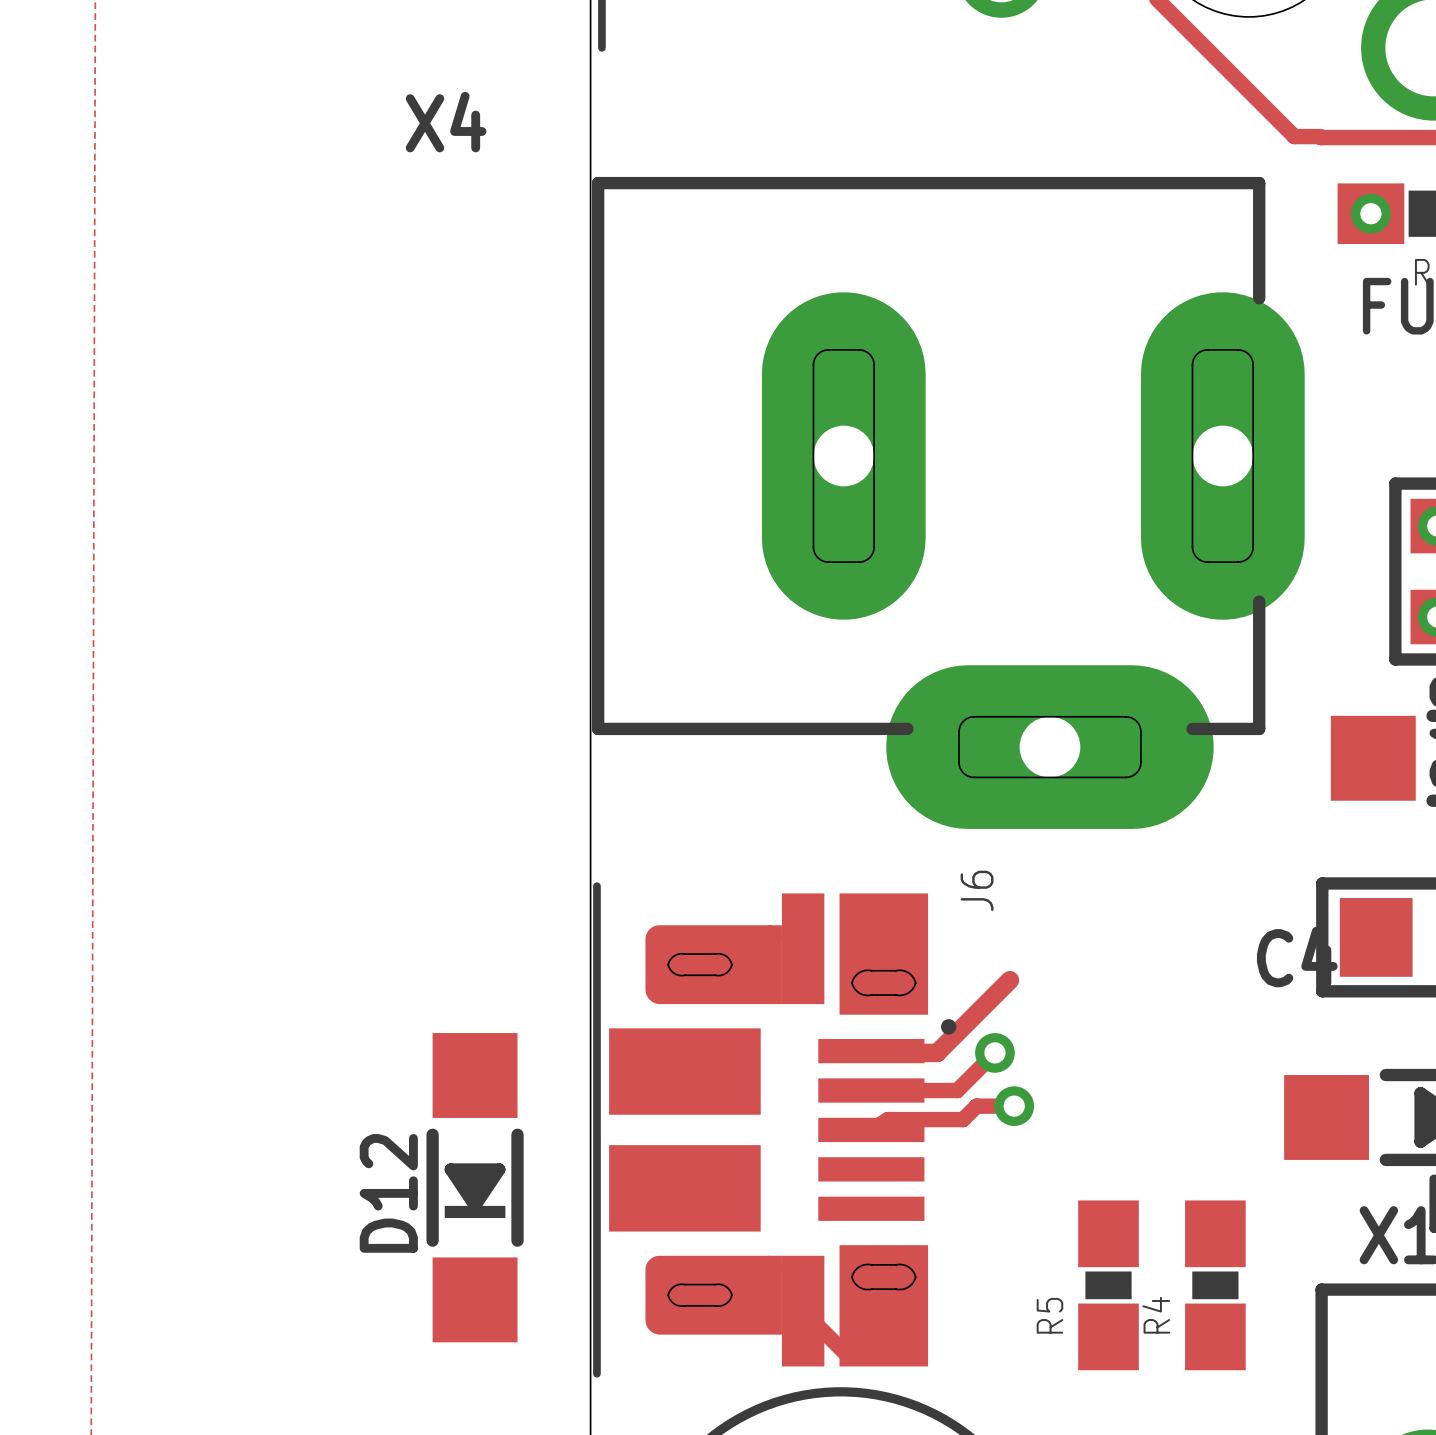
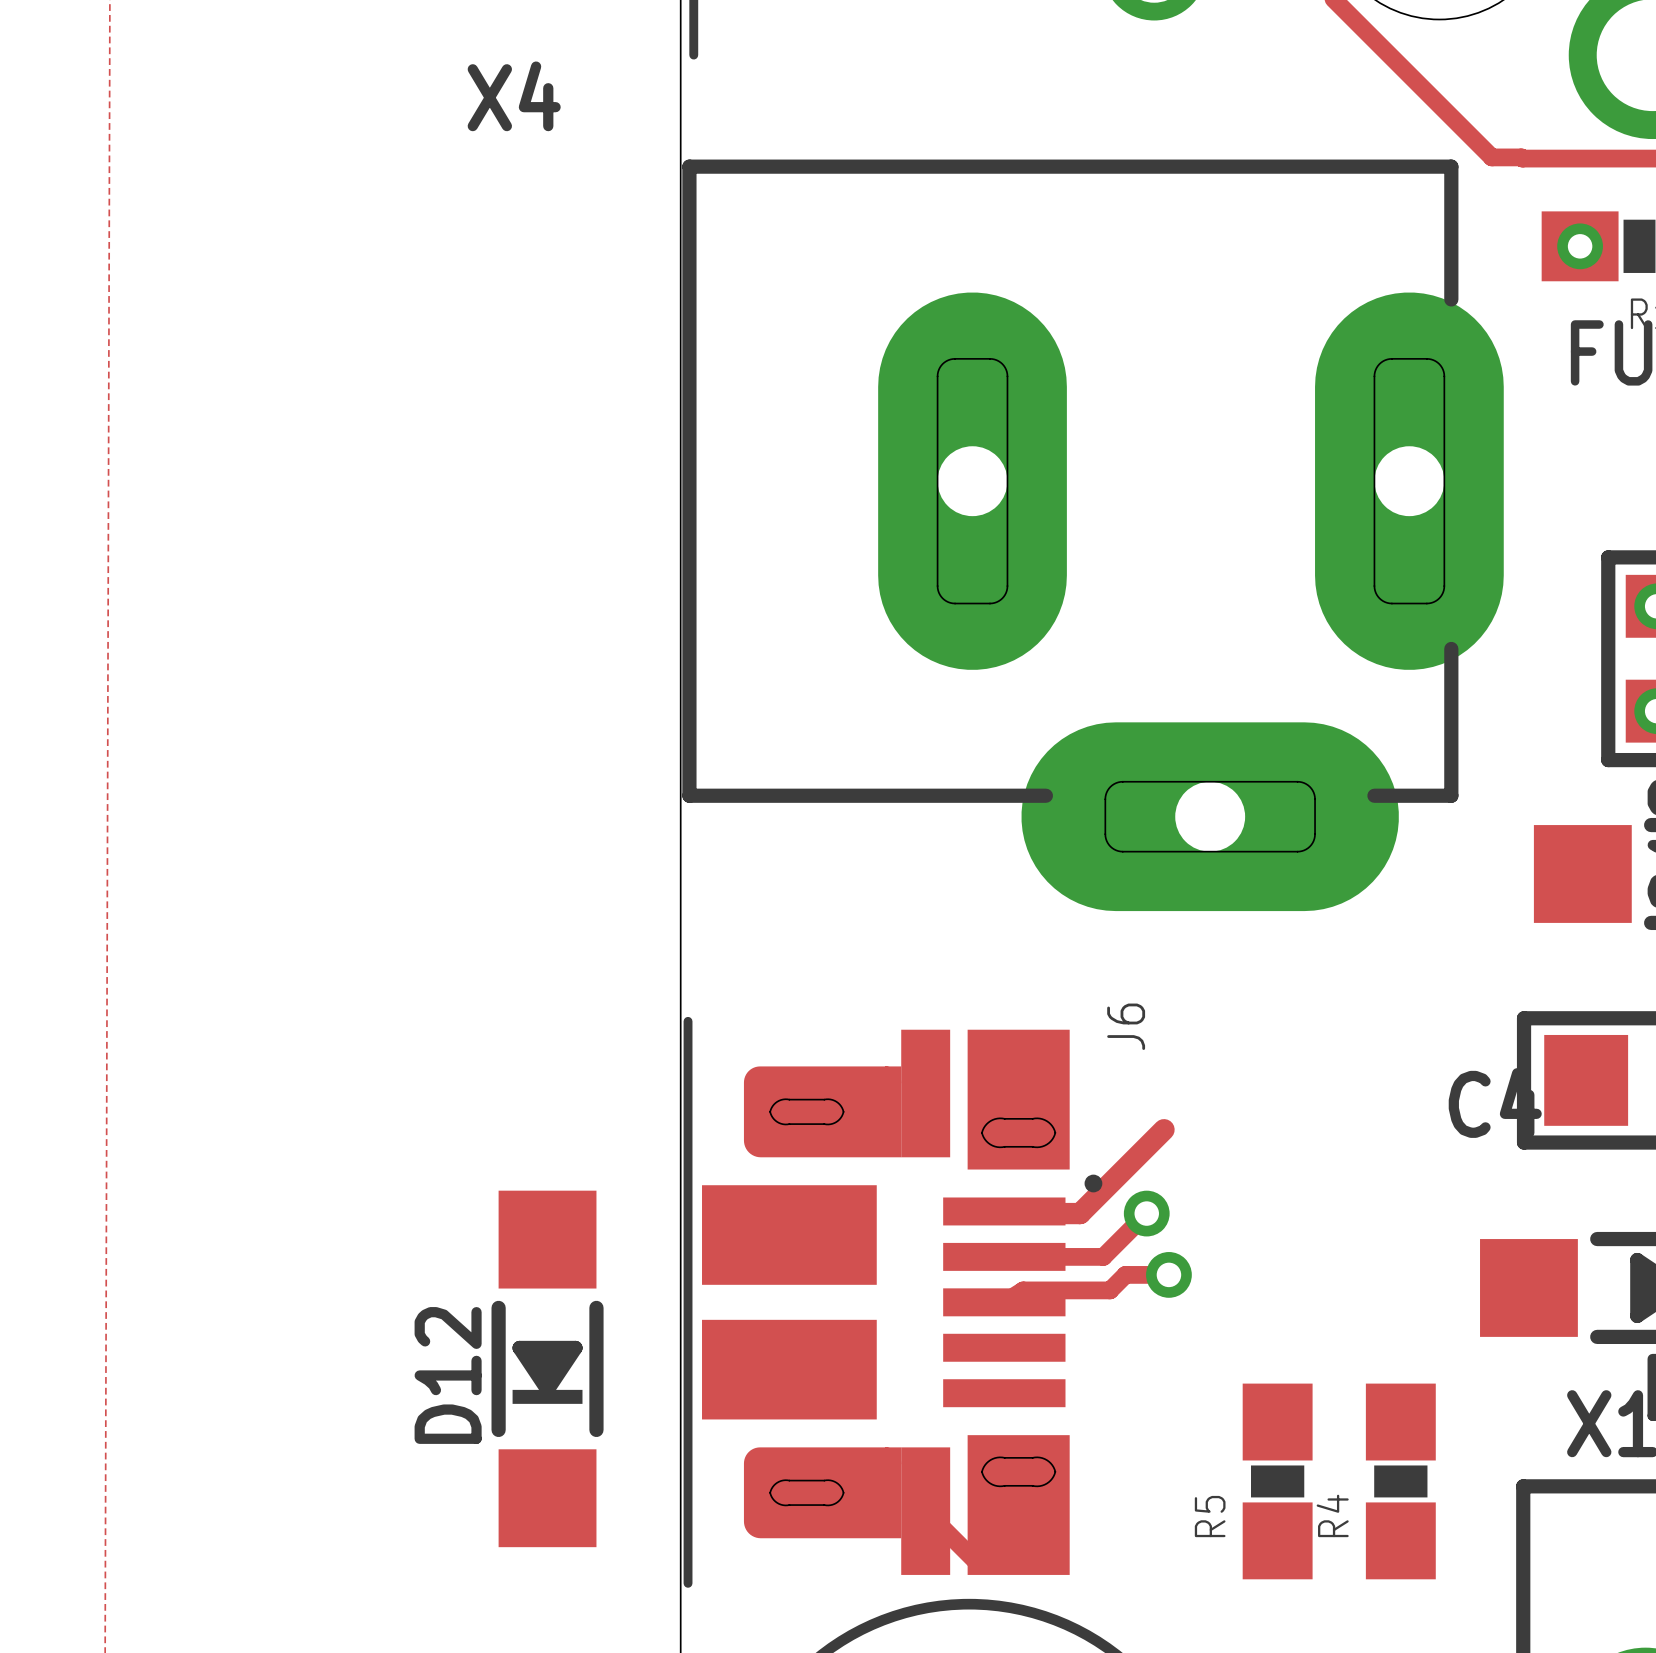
X4 position: (948, 502) -> (1093, 535)

